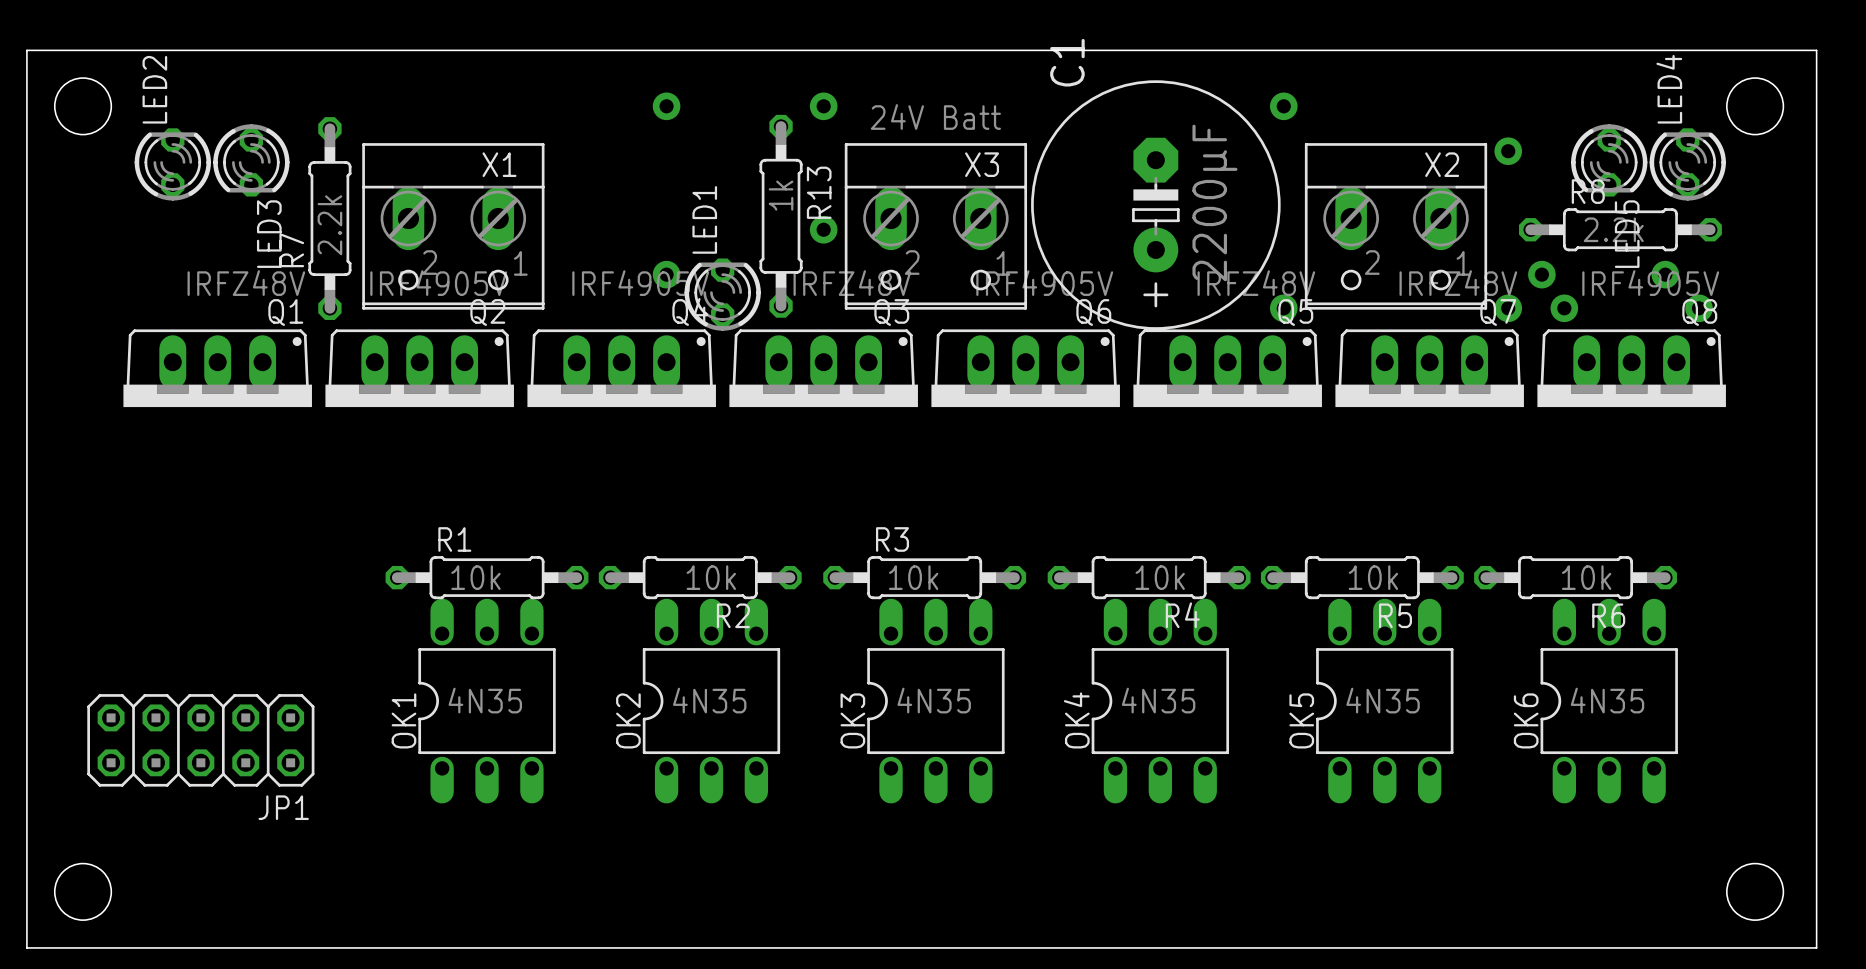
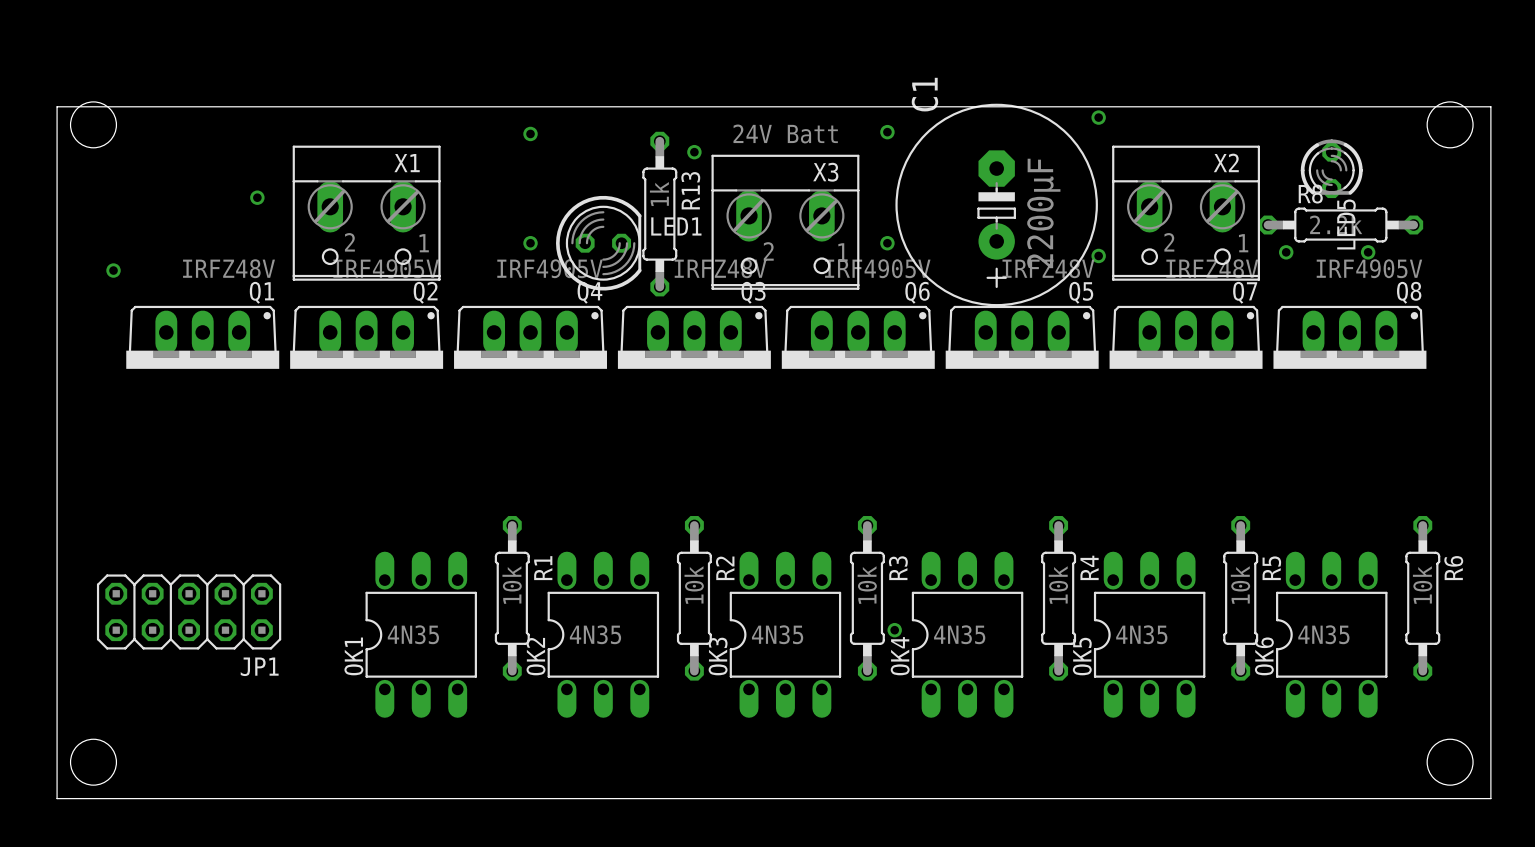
board edge: (26, 50) (26, 947) (1816, 947) (1816, 50) (26, 50) -> (57, 106) (57, 798) (1490, 798) (1490, 106) (57, 106)
via: none -> (1098, 117)
via: (666, 106) -> none
via: (823, 106) -> none
via: (1283, 106) -> none
via: none -> (887, 132)
via: none -> (530, 133)
via: none -> (694, 152)
via: (1508, 151) -> none
LED3: (251, 160) -> none
LED2: (172, 164) -> none
LED4: (1687, 164) -> none
via: none -> (257, 197)
C1 position: (1155, 205) -> (996, 204)
R7: 2.2k (329, 218) -> none
LED1 name position: LED1 (704, 219) -> LED1 (676, 226)
X1 position: (453, 226) -> (366, 213)
X2 position: (1396, 226) -> (1186, 213)
via: (823, 229) -> none
via: none -> (530, 243)
via: none -> (887, 243)
LED1 footprint: [684, 258, 761, 331] -> [556, 195, 642, 291]
via size: [1528, 260, 1556, 289] -> [1279, 245, 1294, 260]
via size: [1651, 260, 1680, 289] -> [1360, 245, 1376, 260]
via: none -> (1098, 255)
via: (666, 274) -> none
via: none -> (113, 270)
via: (1283, 308) -> none
via: (1508, 308) -> none
via: (1564, 308) -> none
via: (1699, 308) -> none
R1 rotation: 0° (487, 577) -> 90° clockwise (512, 598)
R1 position: (487, 577) -> (512, 598)
R2 rotation: 0° (700, 577) -> 90° clockwise (694, 598)
R2 position: (700, 577) -> (694, 598)
R3 rotation: 0° (924, 577) -> 90° clockwise (867, 598)
R3 position: (924, 577) -> (867, 598)
R4 rotation: 0° (1149, 577) -> 90° clockwise (1058, 598)
R4 position: (1149, 577) -> (1058, 598)
R5 rotation: 0° (1362, 577) -> 90° clockwise (1240, 598)
R5 position: (1362, 577) -> (1240, 598)
R6 rotation: 0° (1575, 577) -> 90° clockwise (1422, 598)
R6 position: (1575, 577) -> (1422, 598)
R2 name position: R2 (733, 615) -> R2 (725, 568)
R4 name position: R4 (1182, 615) -> R4 (1089, 567)
R5 name position: R5 (1395, 615) -> R5 (1271, 568)
R6 name position: R6 (1608, 615) -> R6 (1453, 568)
OK1 position: (487, 701) -> (421, 634)
OK2 position: (711, 701) -> (603, 634)
OK3 position: (935, 701) -> (785, 634)
OK4 position: (1160, 701) -> (967, 634)
OK5 position: (1384, 701) -> (1149, 634)
OK6 position: (1609, 701) -> (1331, 634)
via: none -> (894, 630)
JP1 position: (200, 740) -> (189, 611)

